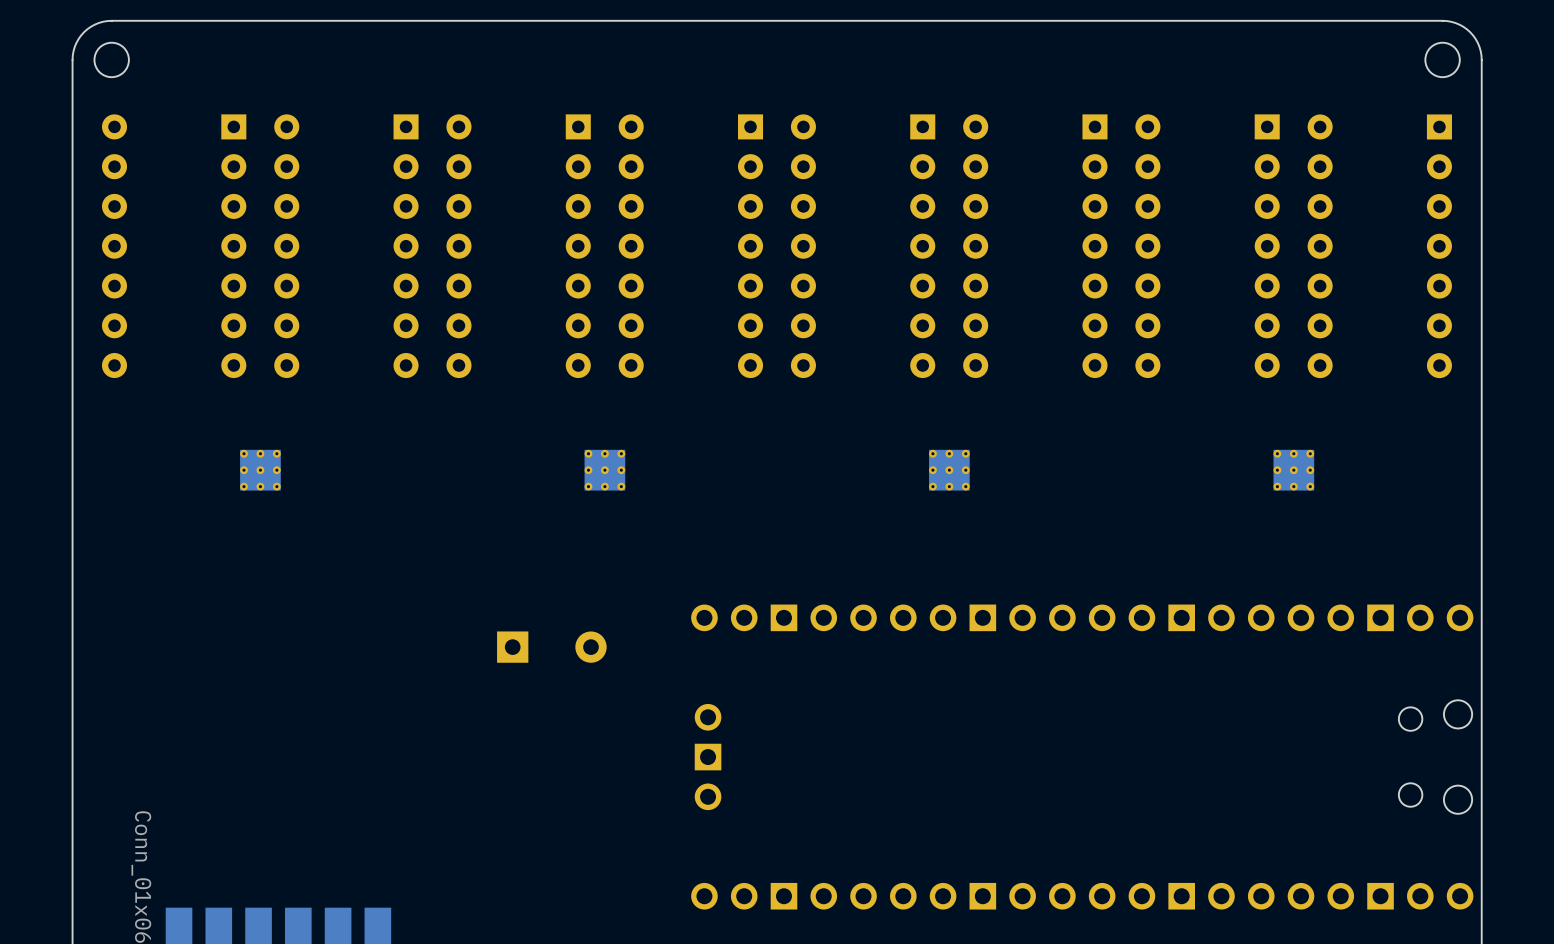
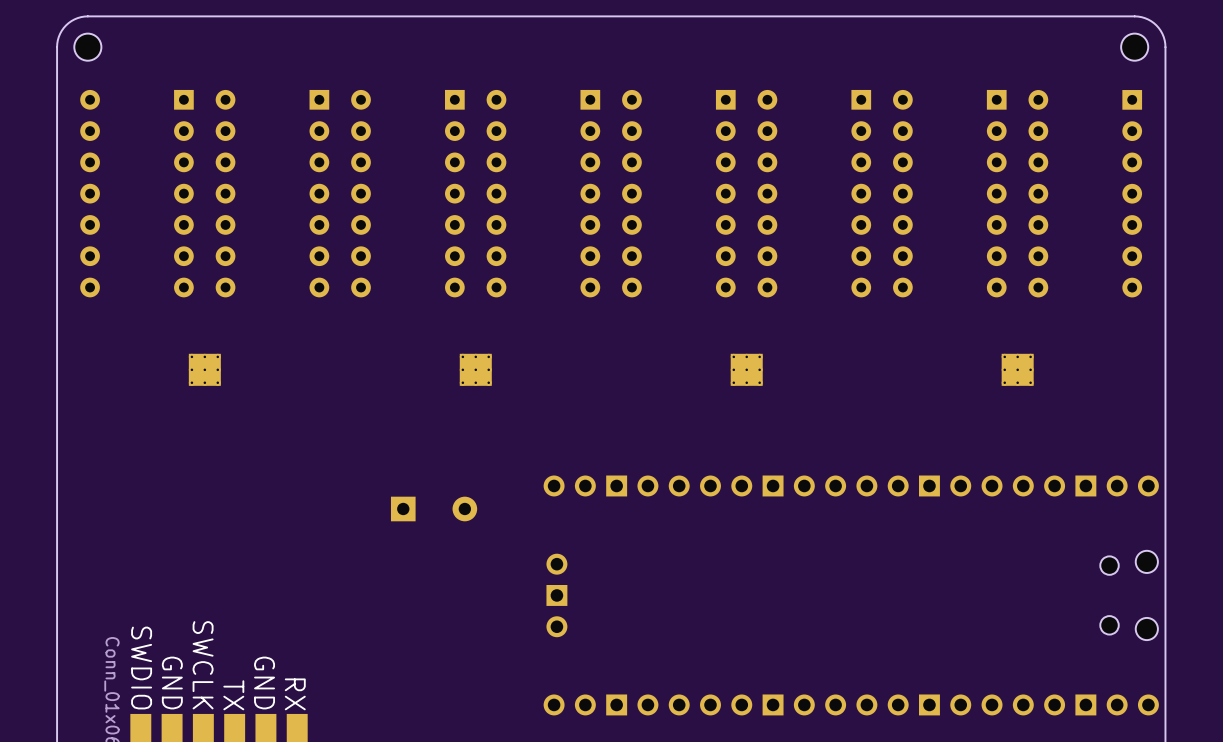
text: none -> SWDIO (141, 668)
text: none -> SWCLK (203, 665)
text: none -> GND (172, 683)
text: none -> GND (264, 683)
text: none -> TX (233, 695)
text: none -> RX (295, 694)

